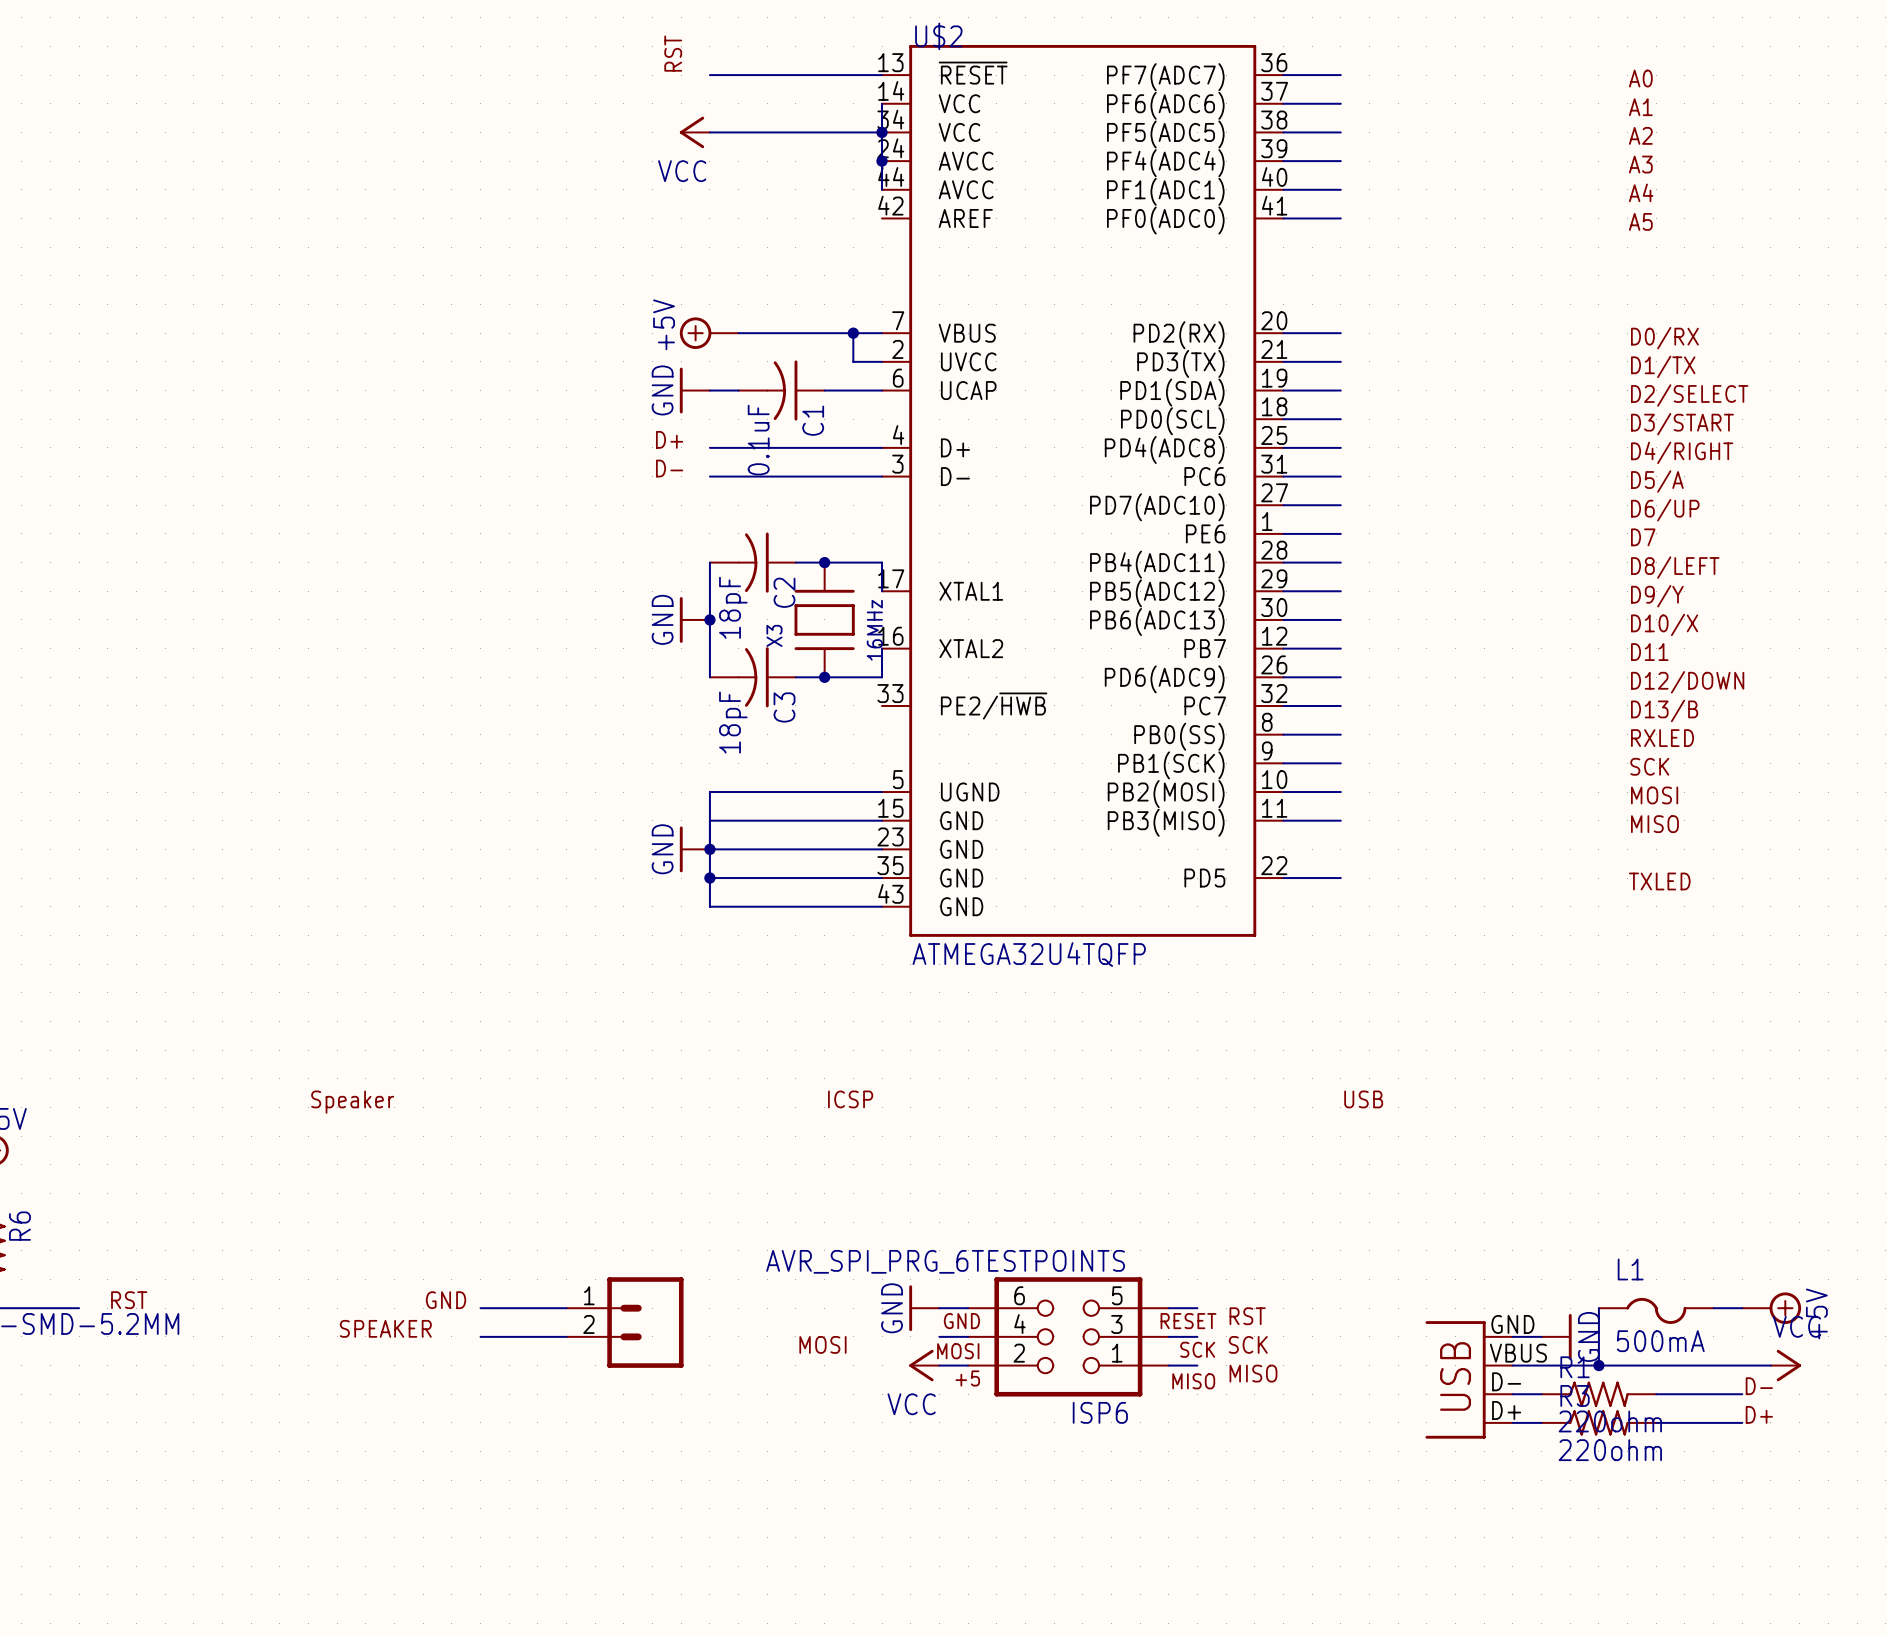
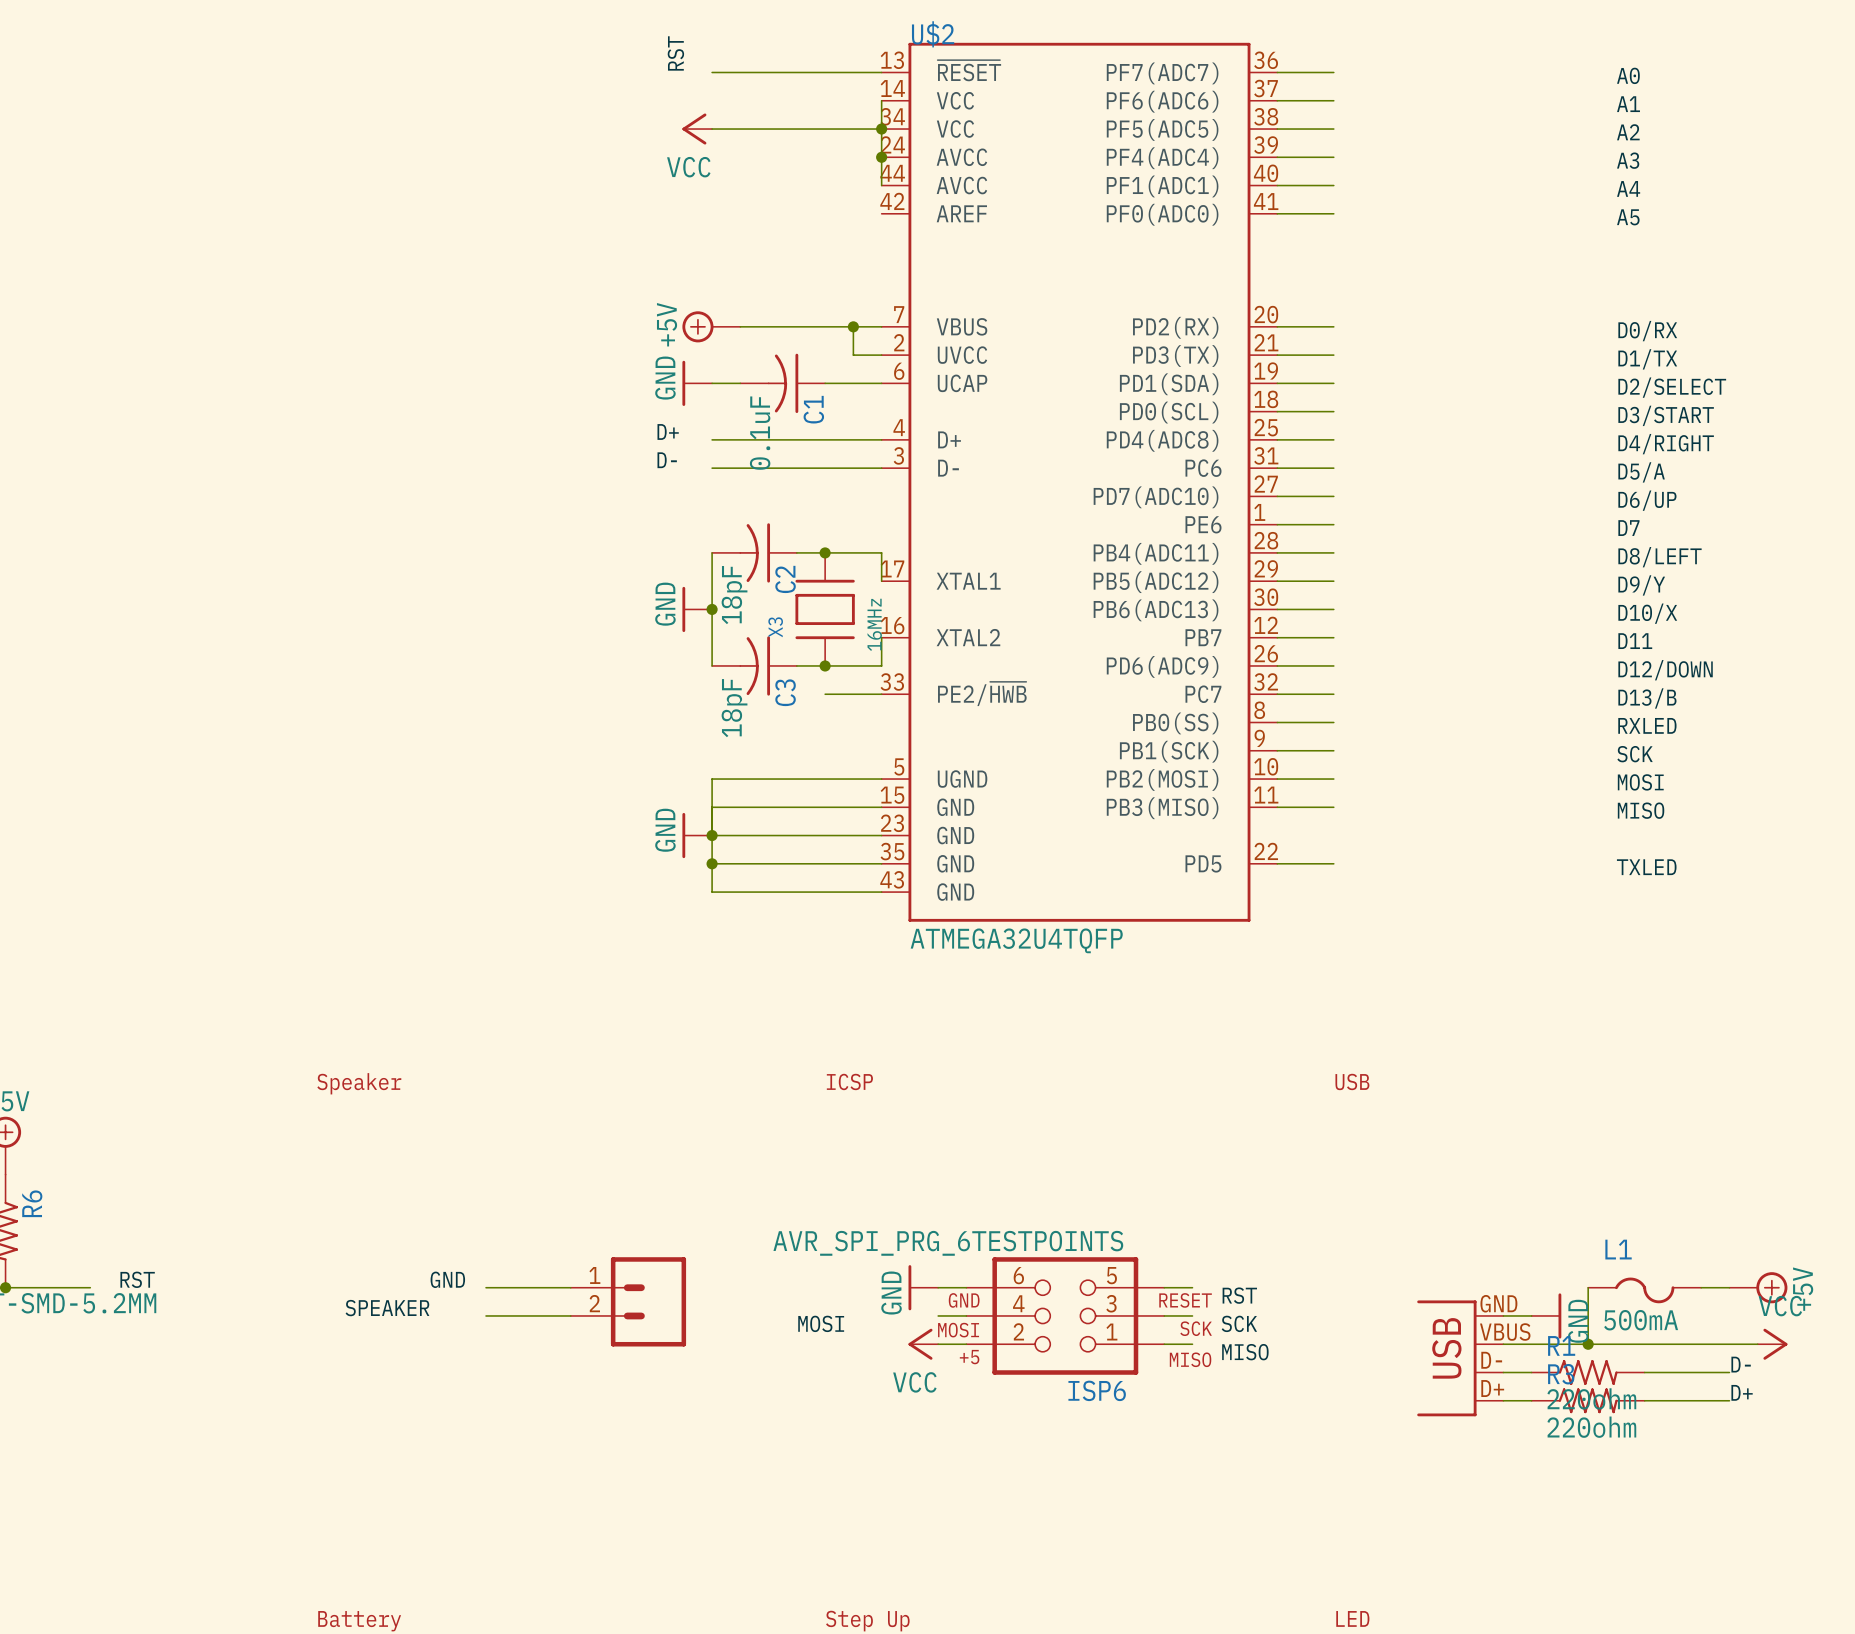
wire: none -> (825, 694) (881, 694)

